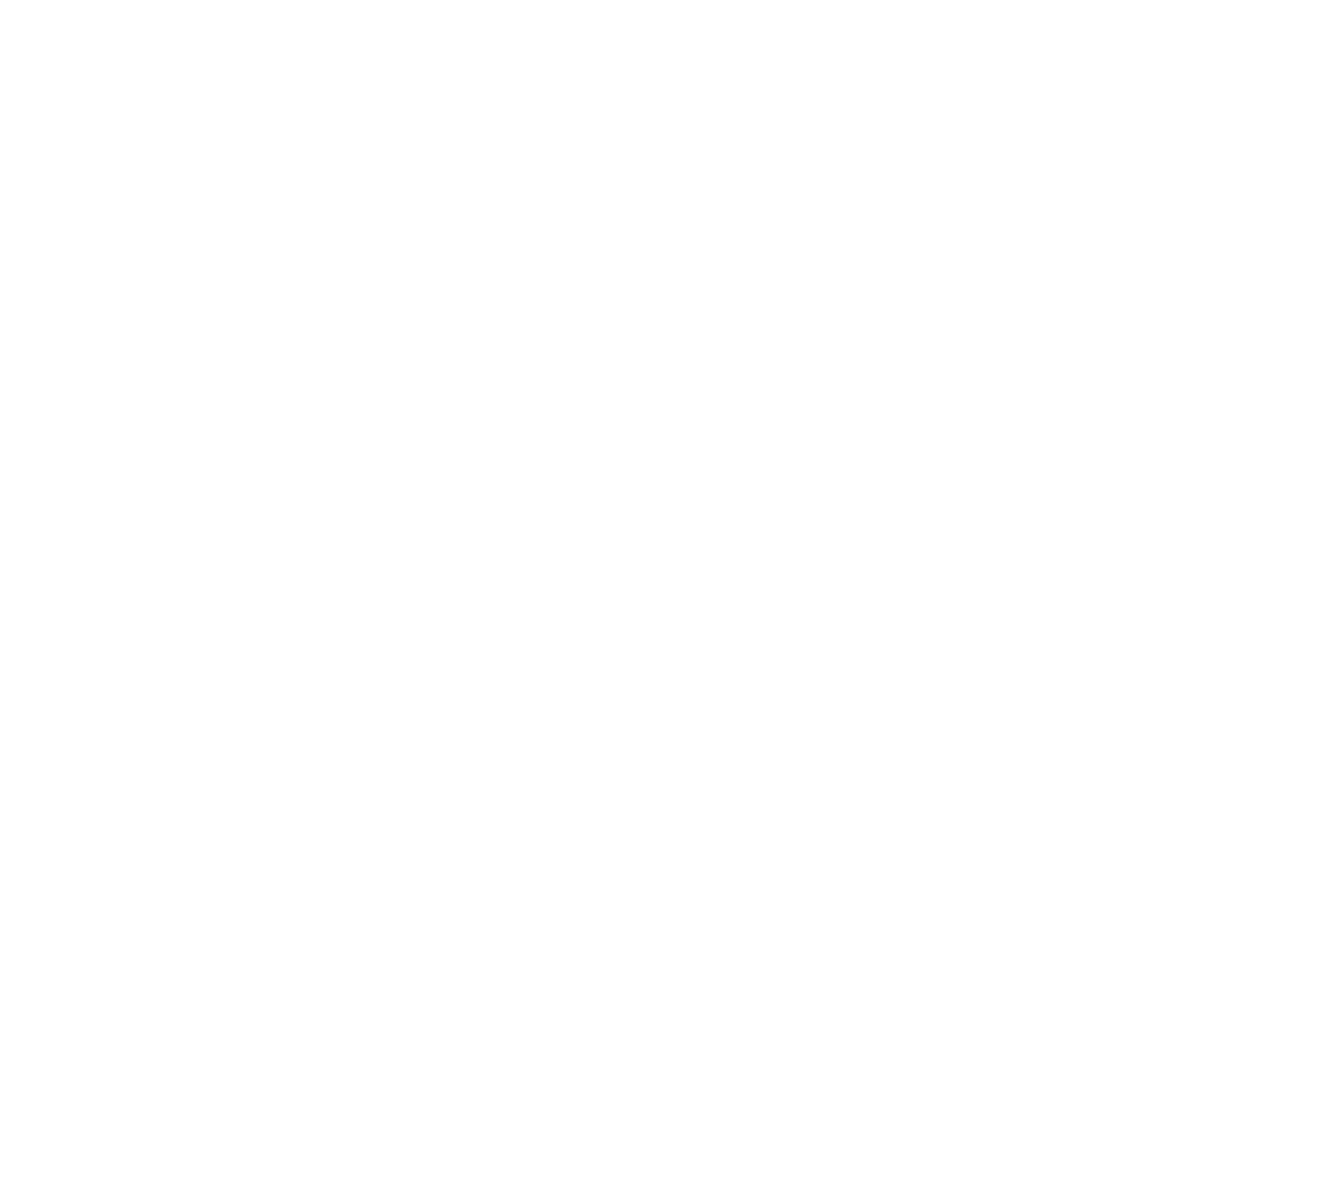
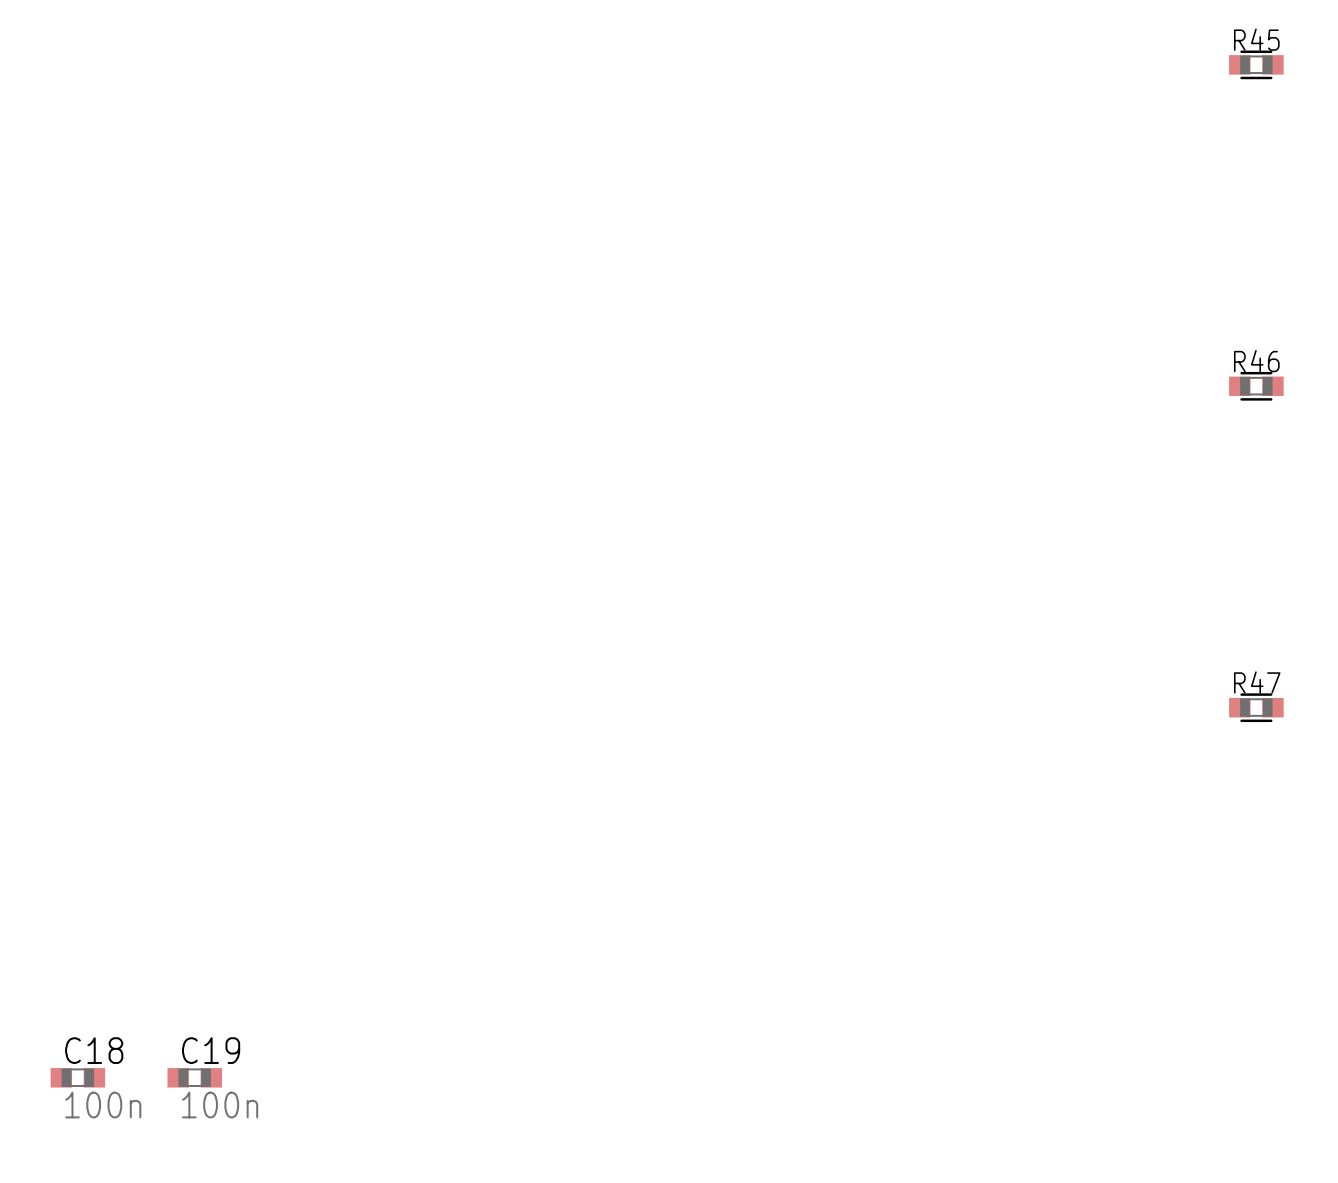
R45: none -> (1256, 64)
R46: none -> (1256, 386)
R47: none -> (1256, 707)
C18: none -> 100n (77, 1077)
C19: none -> 100n (194, 1077)

